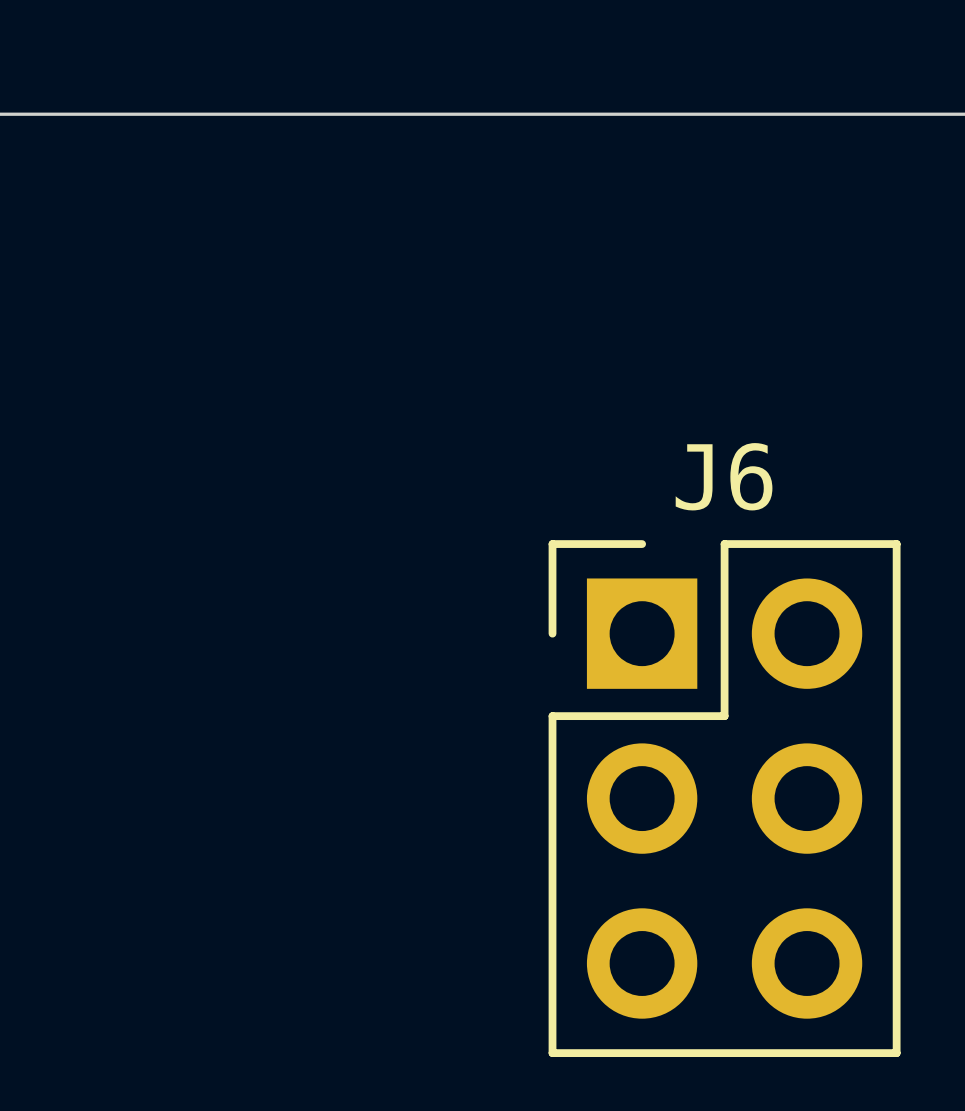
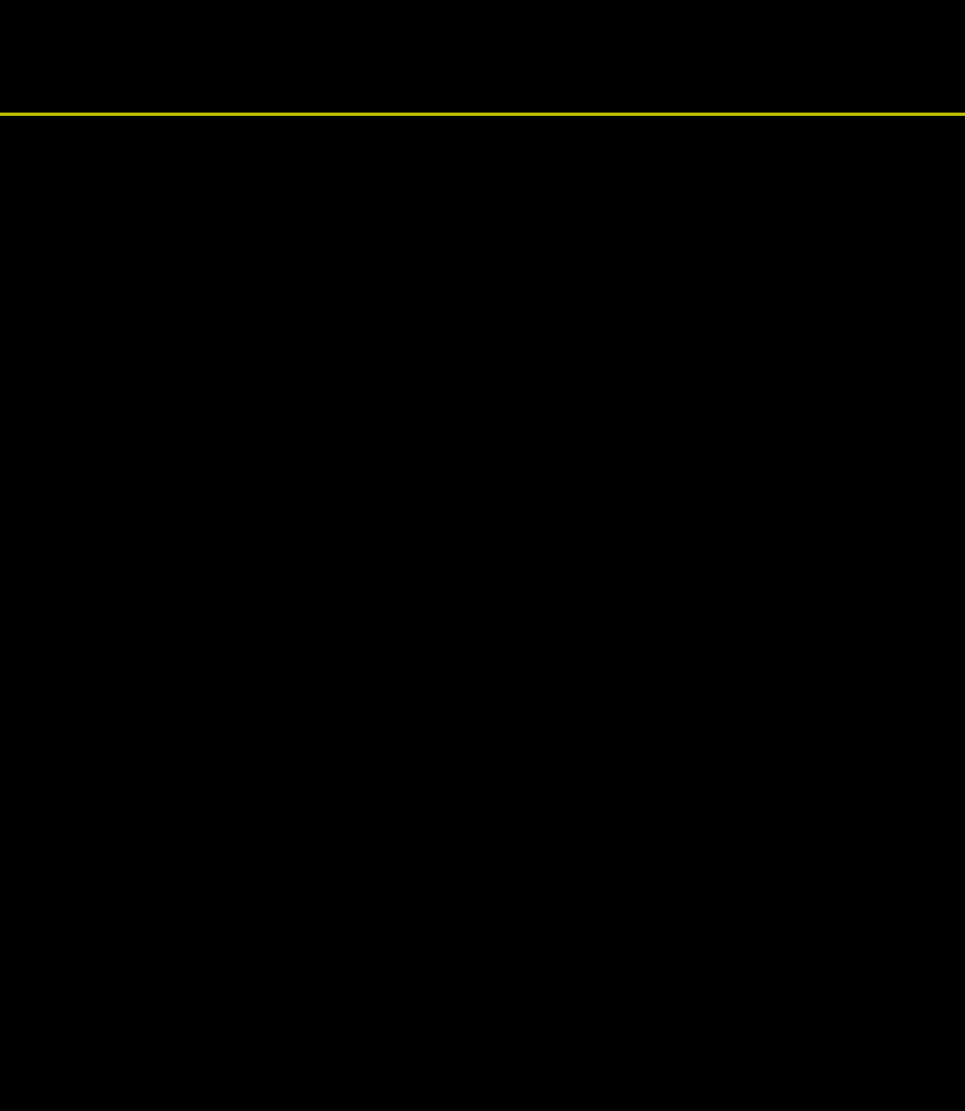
J6: (724, 798) -> none

